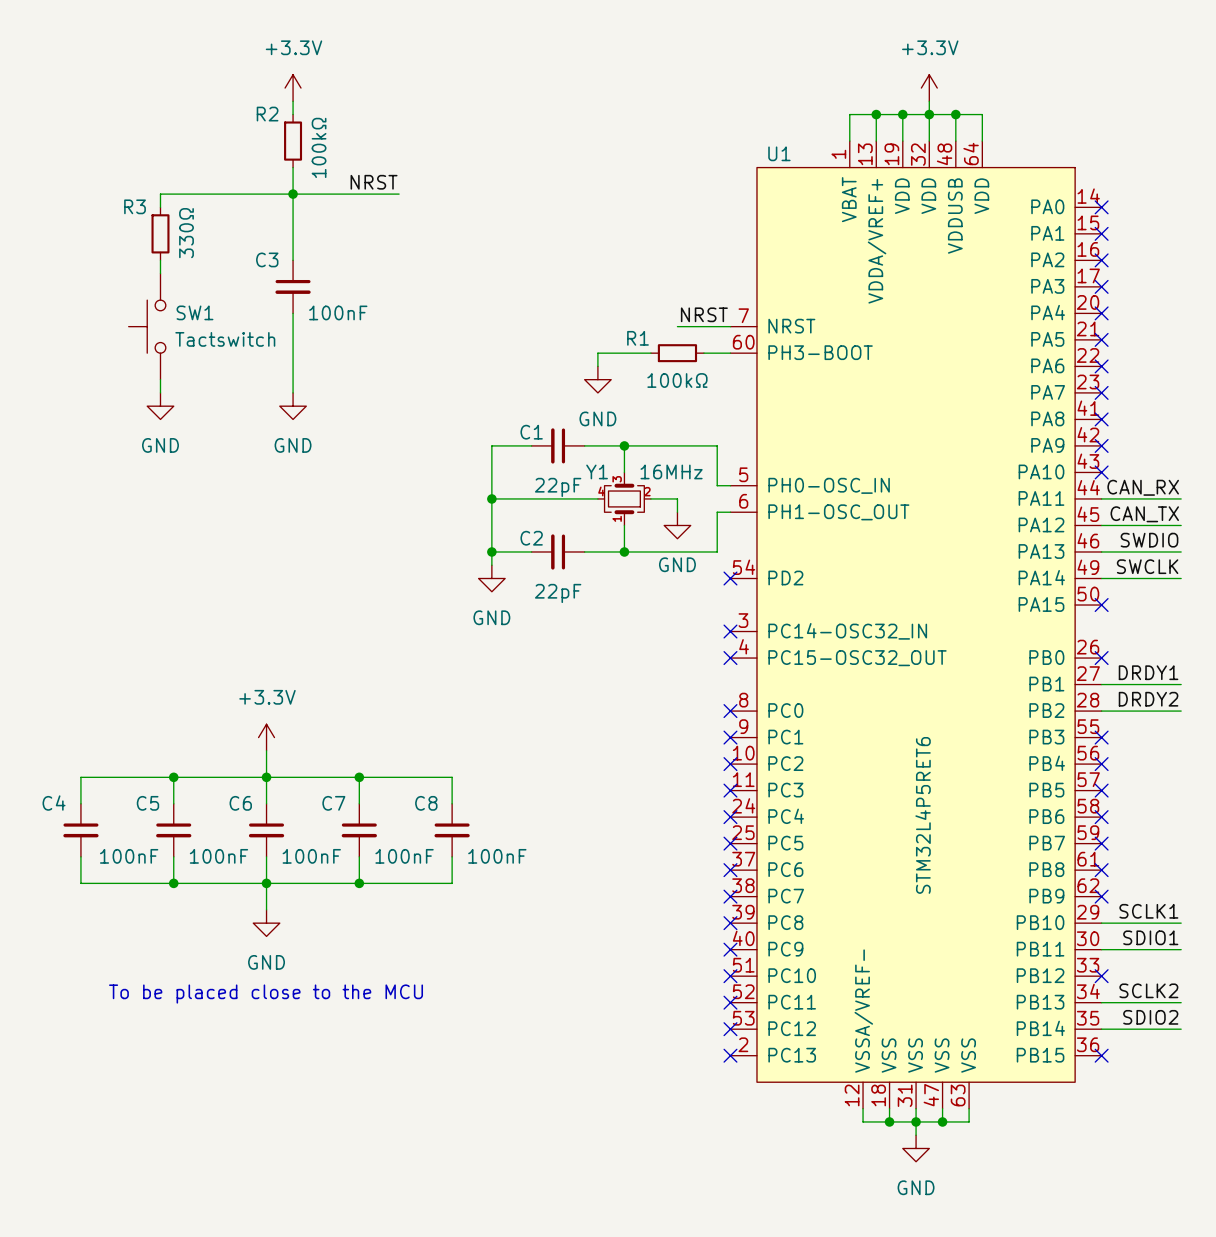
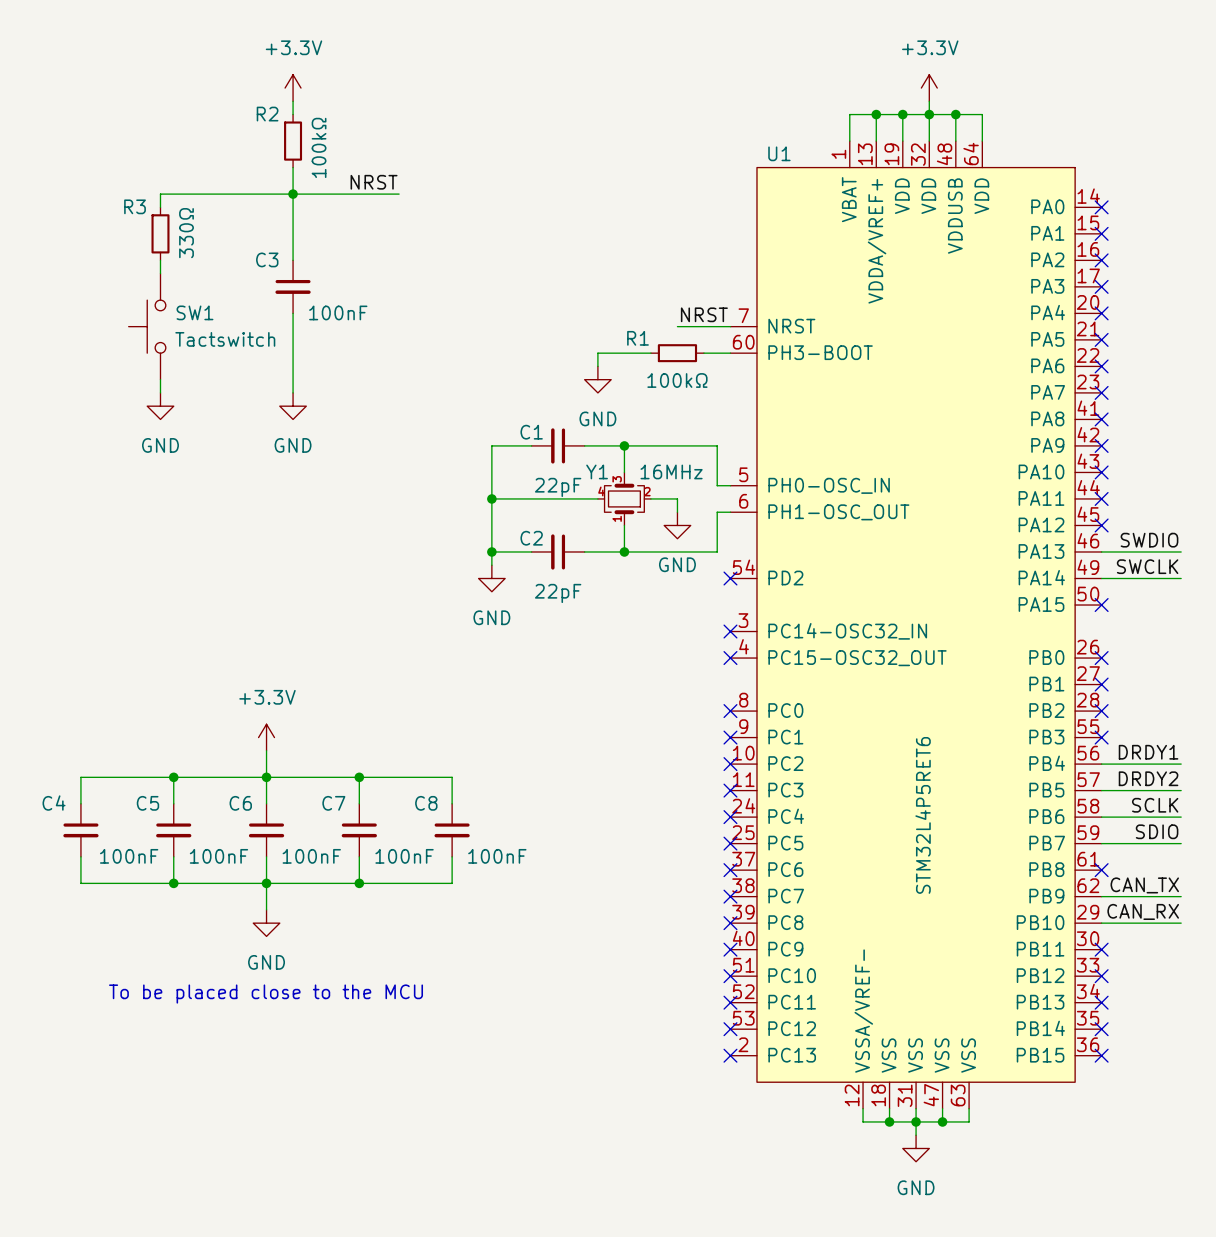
label: CAN_RX (1143, 487) -> none
wire: (1101, 498) (1181, 498) -> none
no-connect mark: none -> (1101, 498)
label: CAN_TX (1144, 514) -> none
wire: (1101, 525) (1181, 525) -> none
no-connect mark: none -> (1101, 525)
label position: DRDY1 (1148, 672) -> DRDY1 (1148, 752)
wire: (1101, 684) (1181, 684) -> (1101, 896) (1181, 896)
no-connect mark: none -> (1101, 684)
label position: DRDY2 (1148, 699) -> DRDY2 (1148, 778)
wire: (1101, 711) (1181, 711) -> (1101, 790) (1181, 790)
no-connect mark: none -> (1101, 711)
no-connect mark: (1101, 764) -> none
no-connect mark: (1101, 790) -> none
label: none -> SCLK (1155, 805)
no-connect mark: (1101, 817) -> none
label: none -> SDIO (1157, 831)
no-connect mark: (1101, 843) -> none
label: none -> CAN_TX (1144, 885)
no-connect mark: (1101, 896) -> none
label: SCLK1 (1148, 911) -> CAN_RX (1143, 911)
label: SDIO1 (1150, 937) -> none
wire: (1101, 949) (1181, 949) -> (1101, 764) (1181, 764)
no-connect mark: none -> (1101, 949)
label: SCLK2 (1148, 990) -> none
wire: (1101, 1002) (1181, 1002) -> (1101, 817) (1181, 817)
no-connect mark: none -> (1101, 1002)
label: SDIO2 (1150, 1017) -> none
wire: (1101, 1029) (1181, 1029) -> (1101, 843) (1181, 843)
no-connect mark: none -> (1101, 1029)

